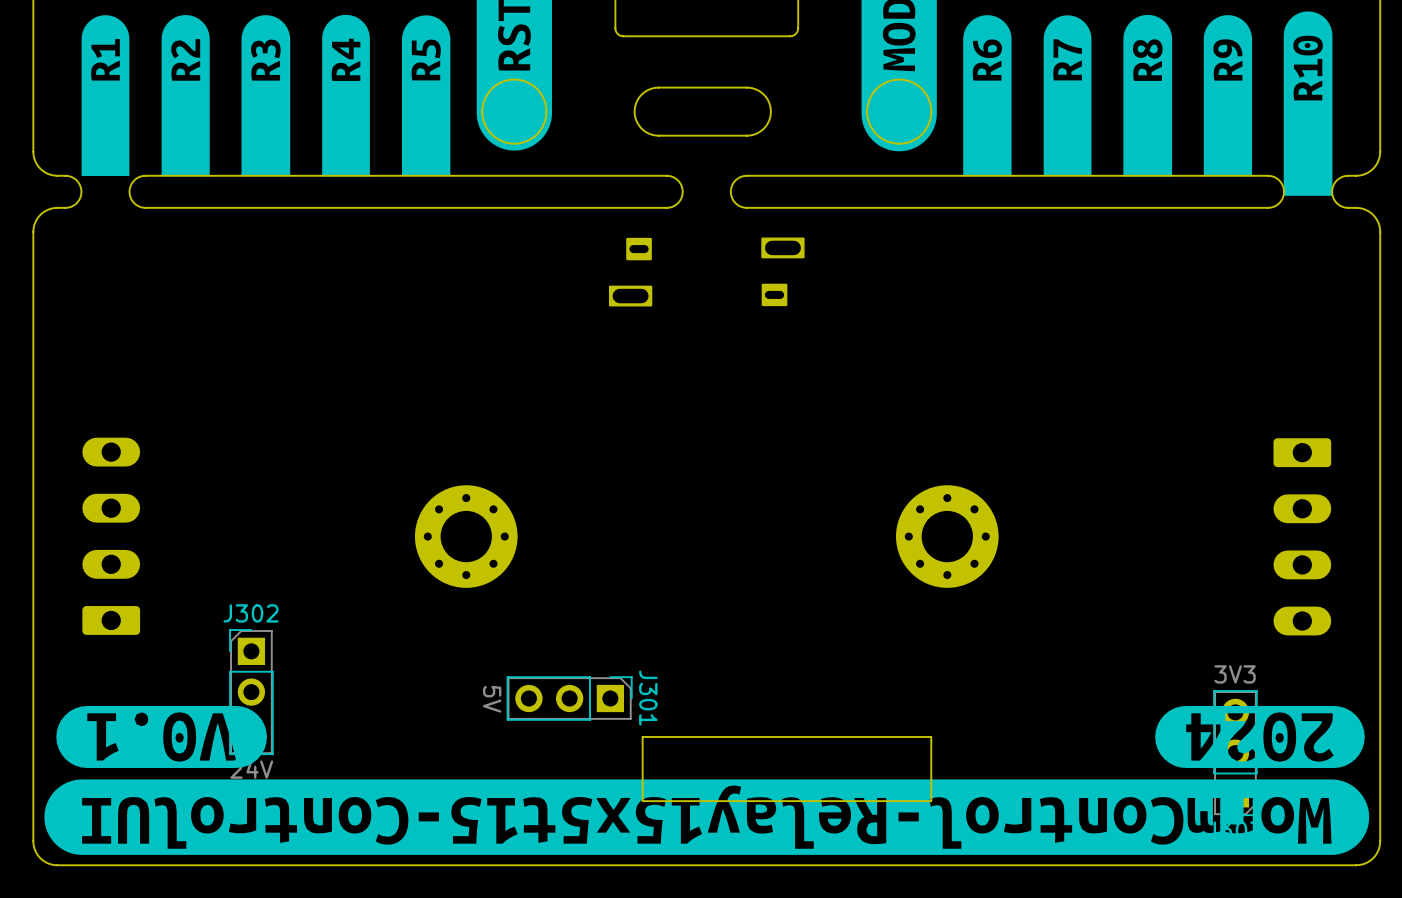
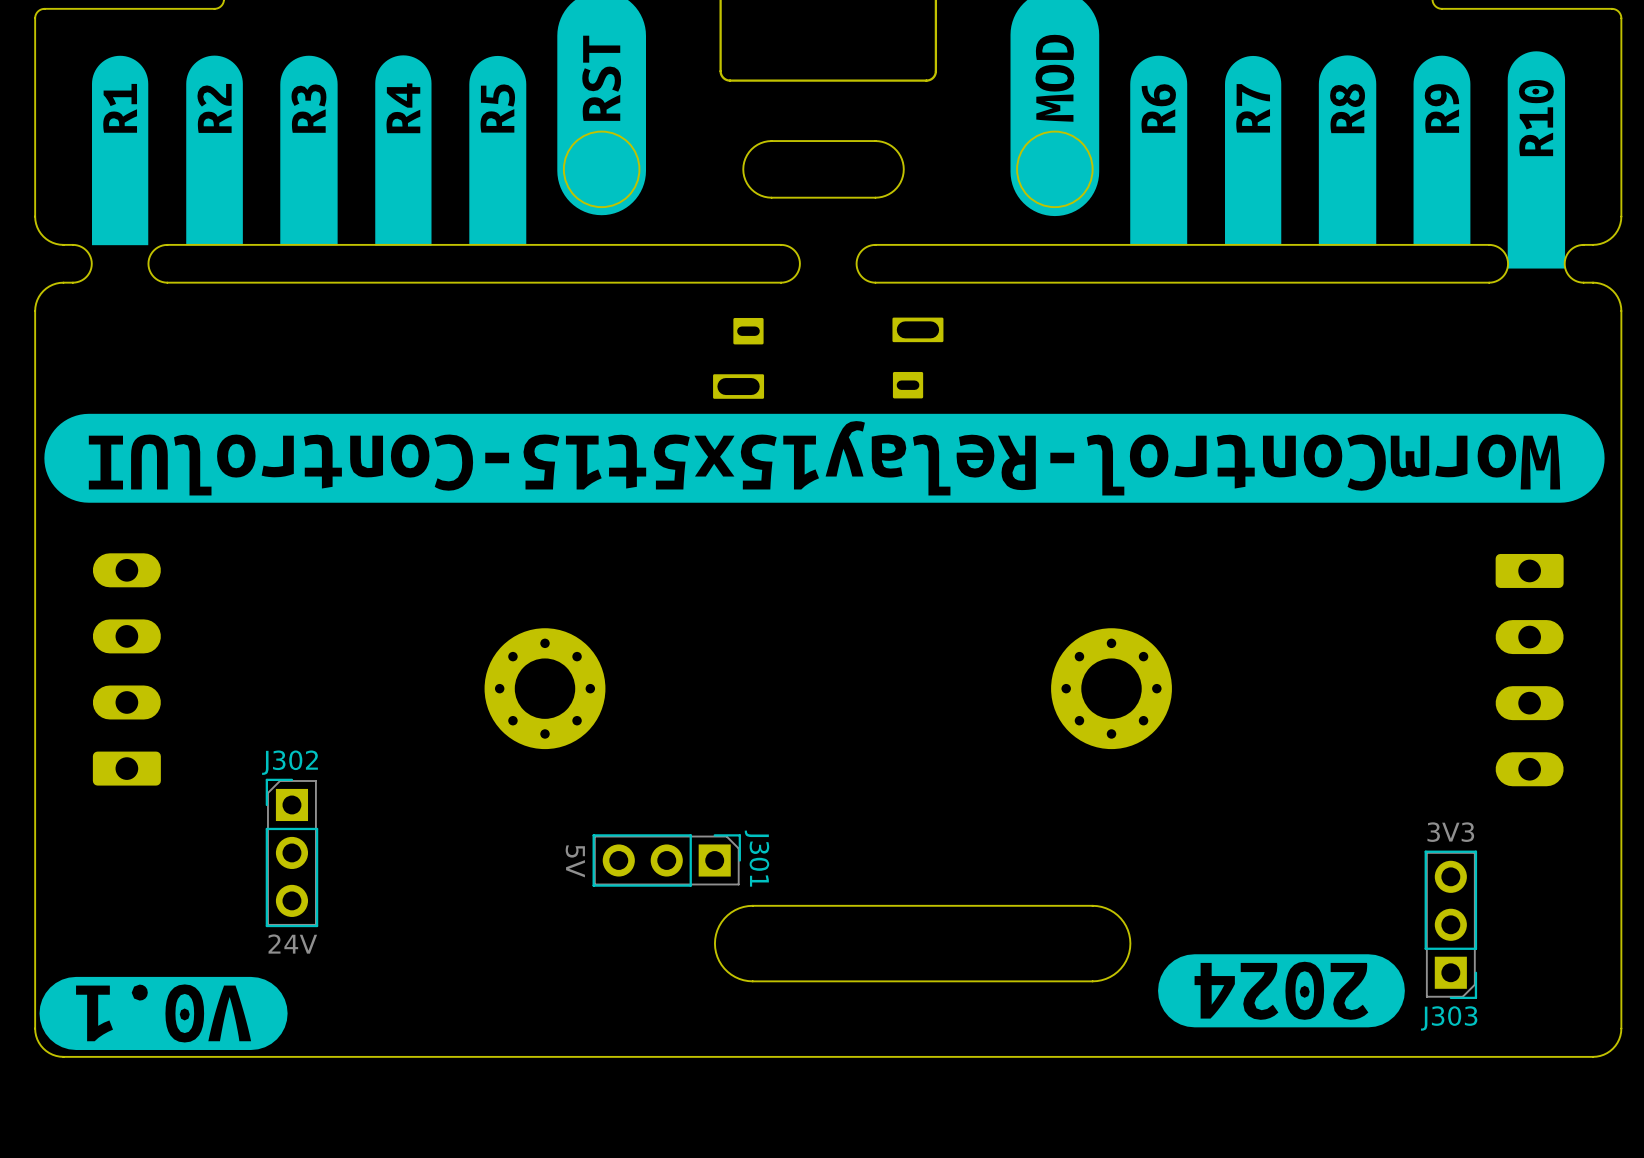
drawing: none -> [44, 413, 1605, 503]
part footprint: [414, 485, 518, 588] -> [484, 628, 606, 750]
part footprint: [895, 485, 999, 588] -> [1051, 628, 1172, 750]
drawing: [44, 705, 1370, 855] -> none
drawing position: (161, 736) -> (163, 1013)
board edge: (642, 736) (642, 801) -> (752, 905) (735, 910) (724, 918) (717, 930) (714, 943) (719, 961) (727, 971) (739, 978) (752, 981)
board edge: (931, 736) (931, 801) -> (1092, 905) (1110, 910) (1120, 918) (1127, 930) (1130, 943) (1127, 956) (1120, 968) (1106, 978) (1092, 981)
drawing: none -> [1158, 954, 1405, 1028]

